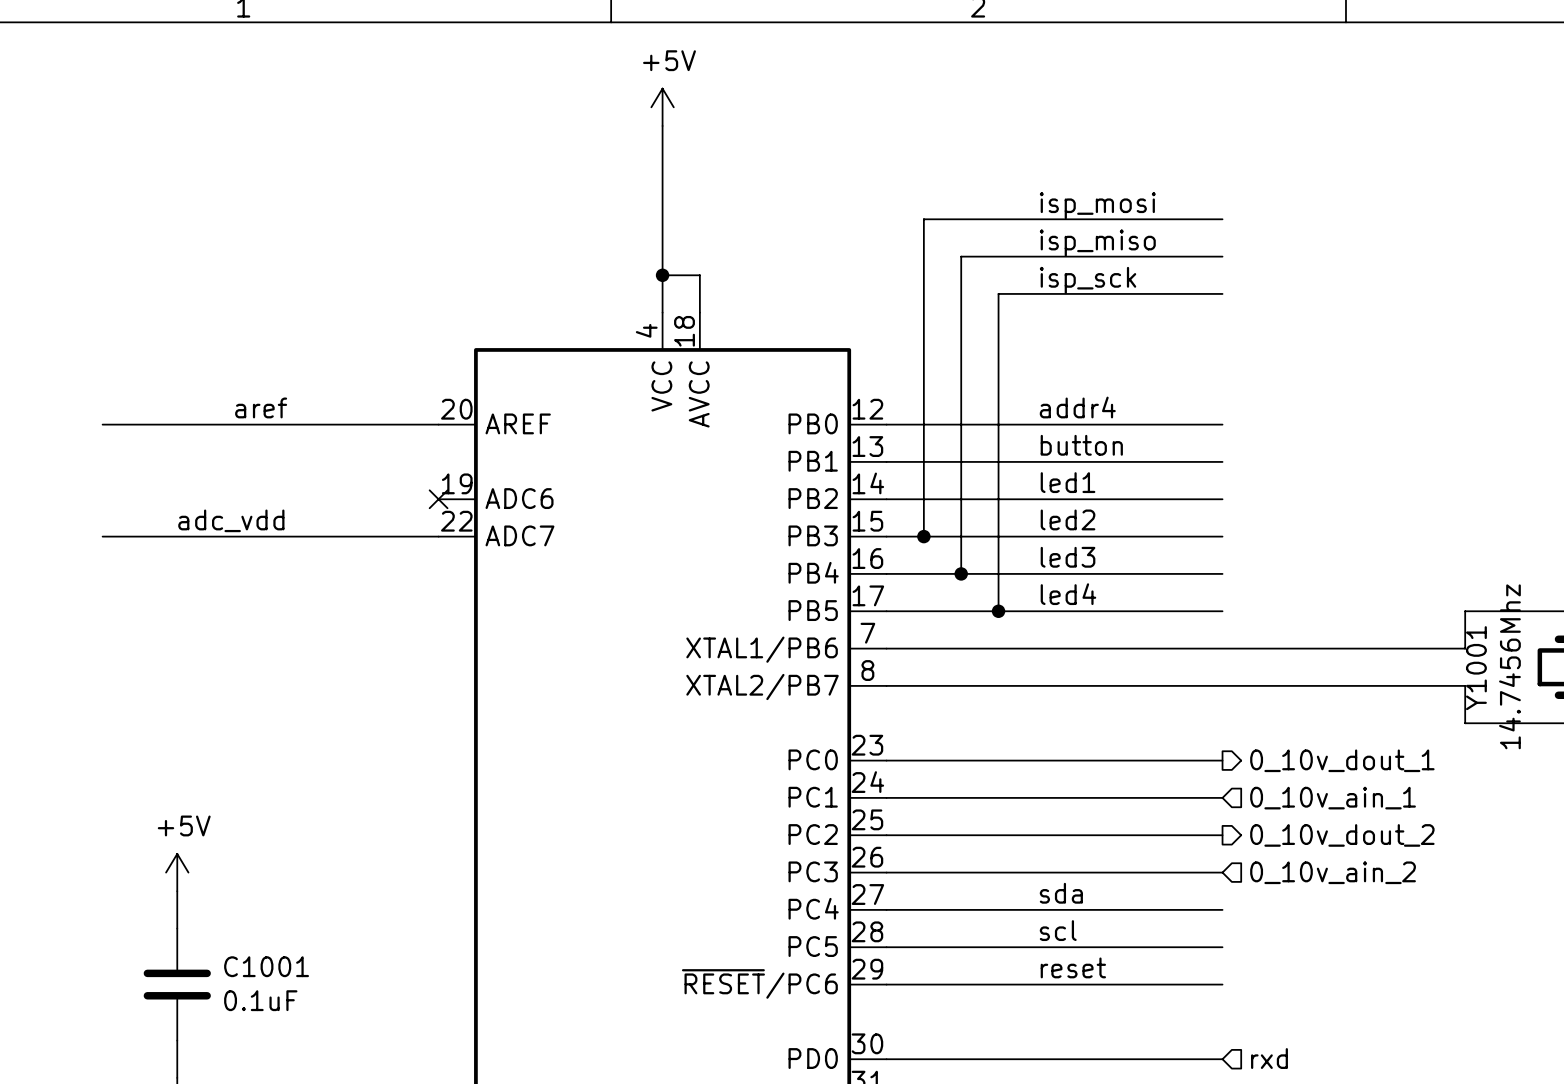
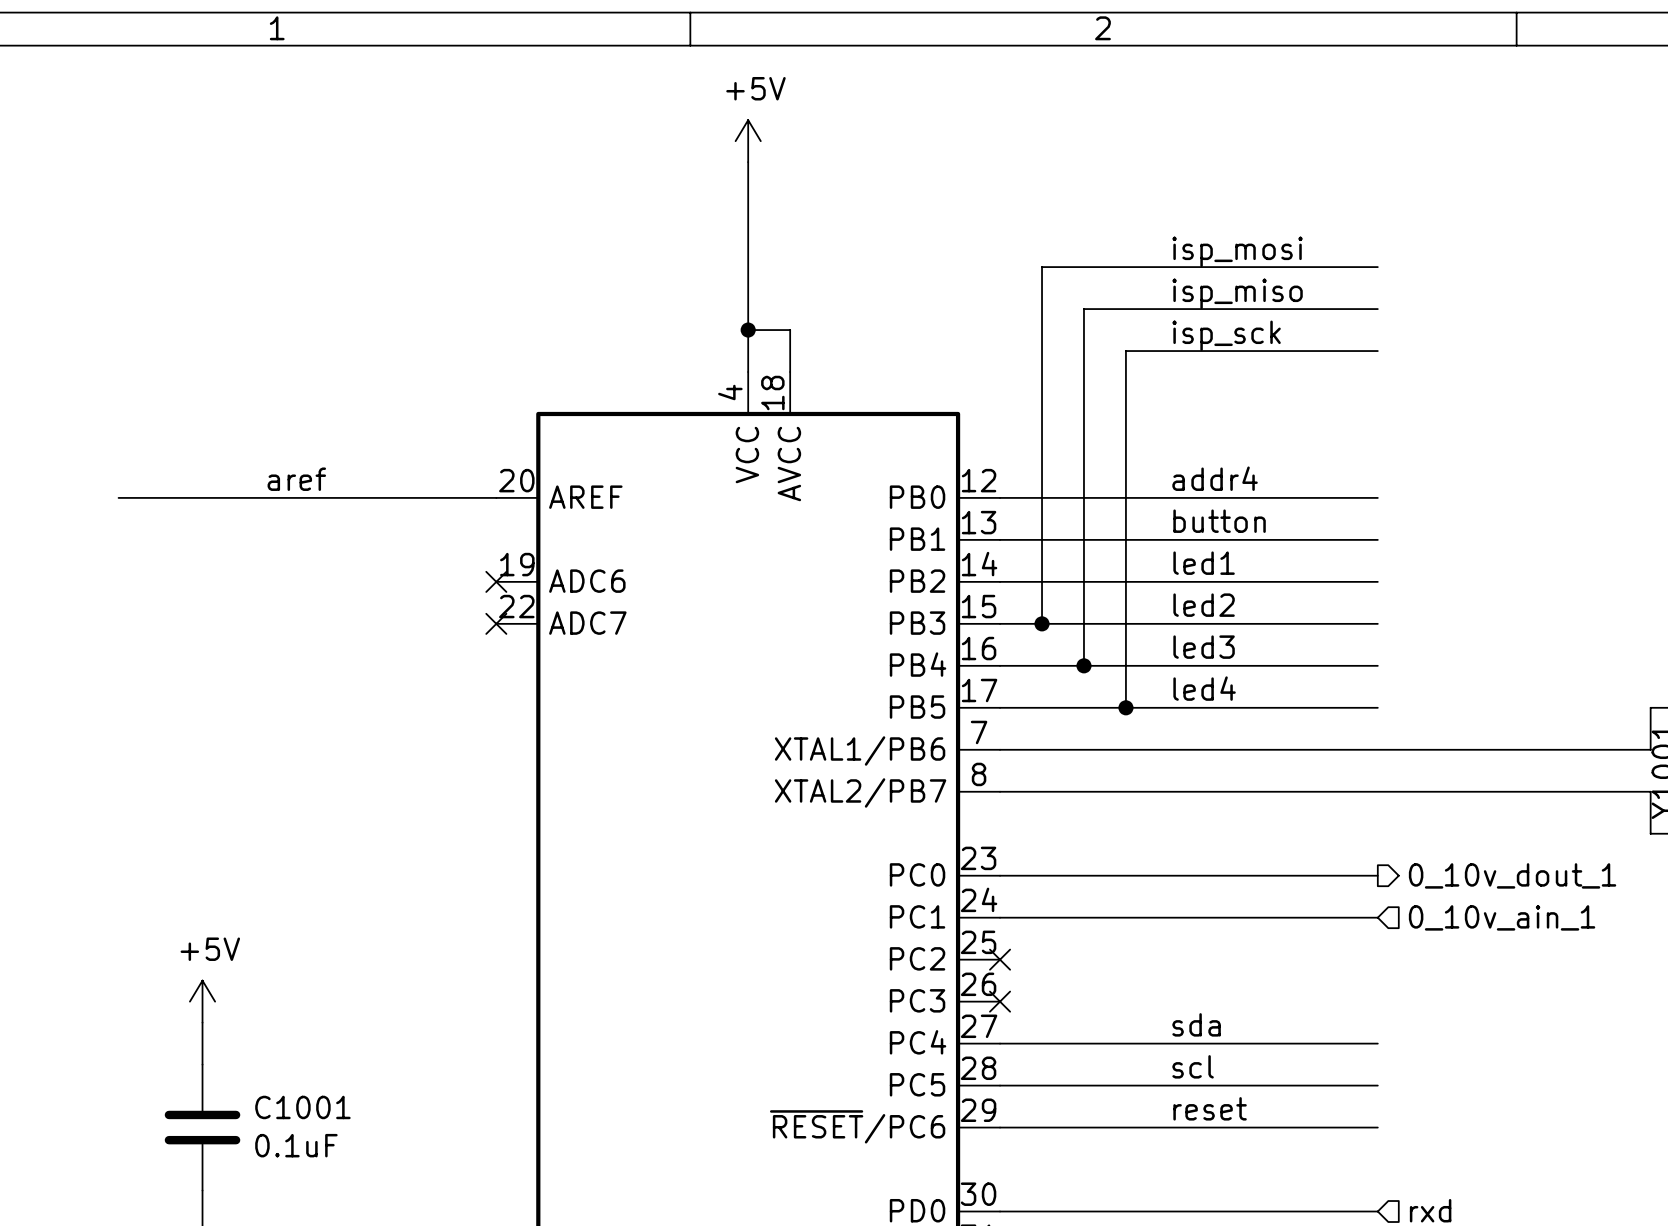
label: adc_vdd (231, 520) -> none
wire: (102, 536) (438, 536) -> none
no-connect mark: none -> (496, 623)
wire: (886, 835) (1222, 835) -> none
no-connect mark: none -> (1000, 959)
hierarchical label: 0_10v_dout_2 (1342, 835) -> none
wire: (886, 872) (1222, 872) -> none
no-connect mark: none -> (1000, 1001)
hierarchical label: 0_10v_ain_2 (1333, 872) -> none

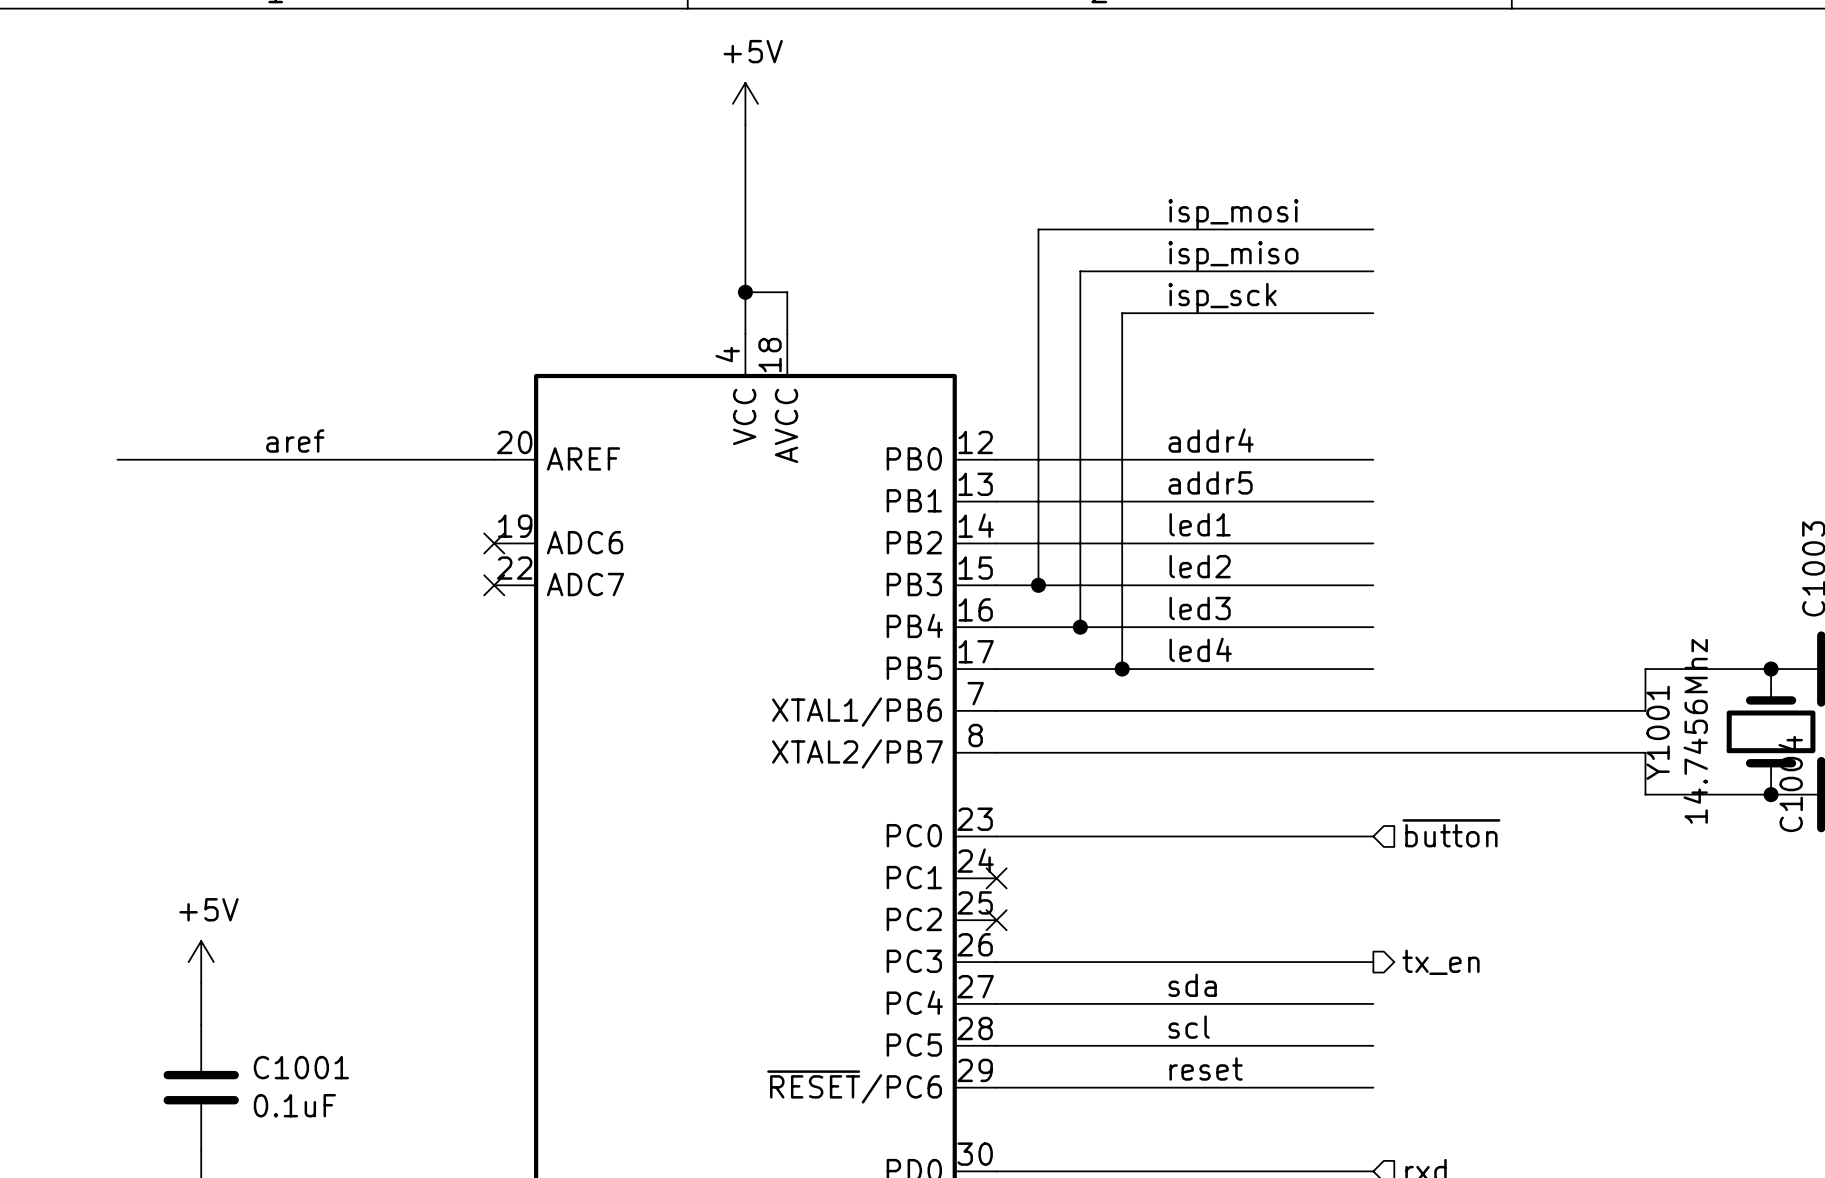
label: button (1219, 521) -> addr5 (1210, 482)
hierarchical label shape: output (1512, 875) -> input (1451, 833)
hierarchical label: 0_10v_dout_1 (1512, 875) -> ~{button} (1451, 833)
wire: (1000, 917) (1377, 917) -> (996, 962) (1373, 962)
hierarchical label: 0_10v_ain_1 (1502, 917) -> none
no-connect mark position: (1000, 1001) -> (996, 878)
hierarchical label: none -> tx_en (1440, 962)

